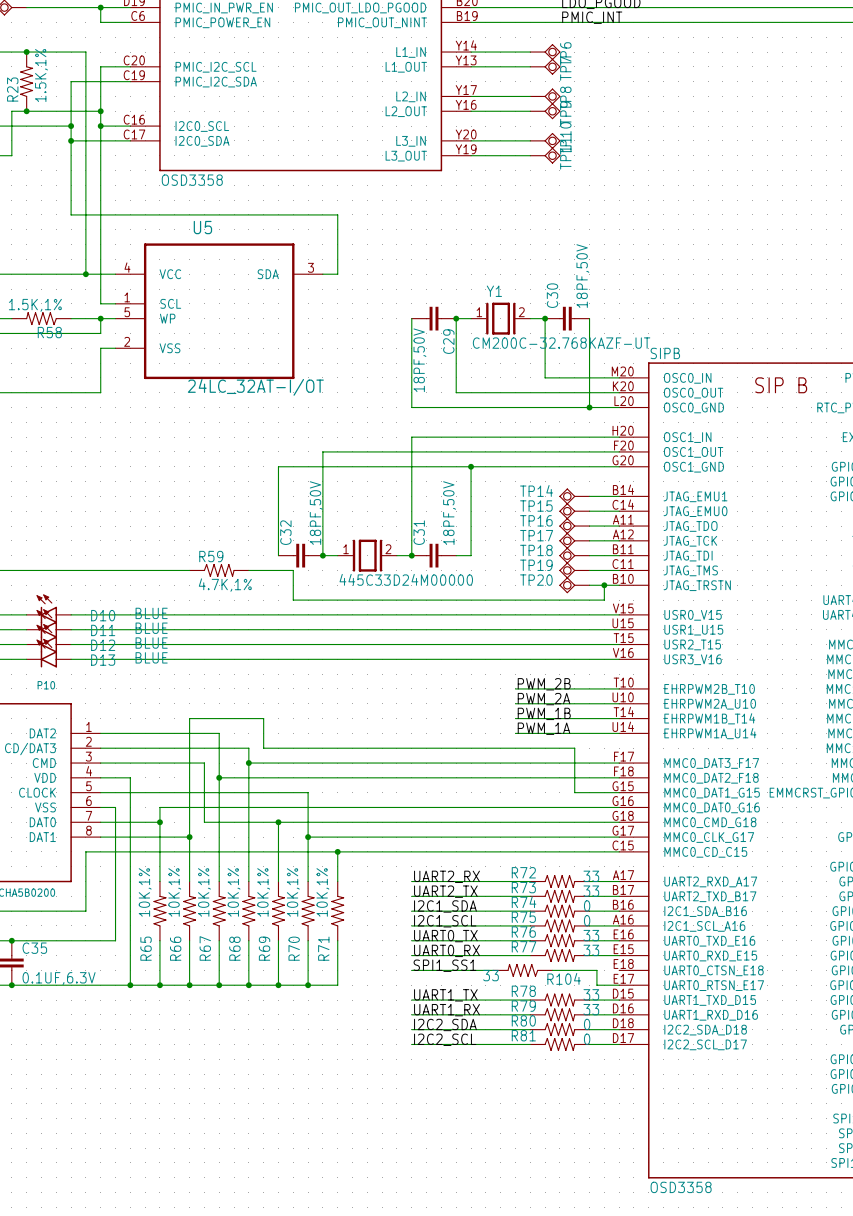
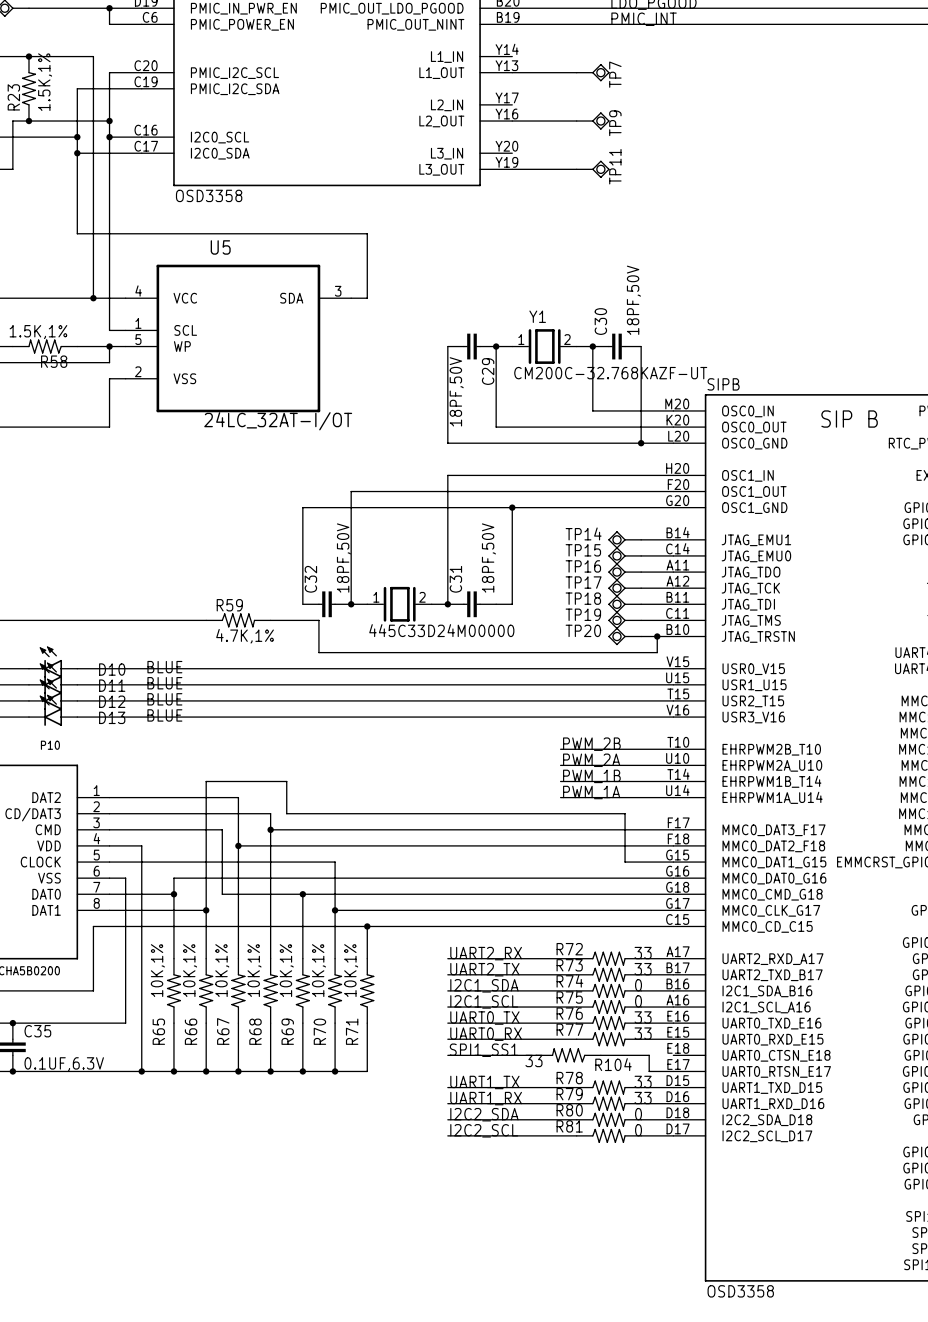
wire: (471, 52) (530, 52) -> none
TP6: (545, 52) -> none
wire: (471, 96) (530, 96) -> none
TP8: (545, 96) -> none
wire: (471, 140) (530, 140) -> none
TP10: (545, 140) -> none

